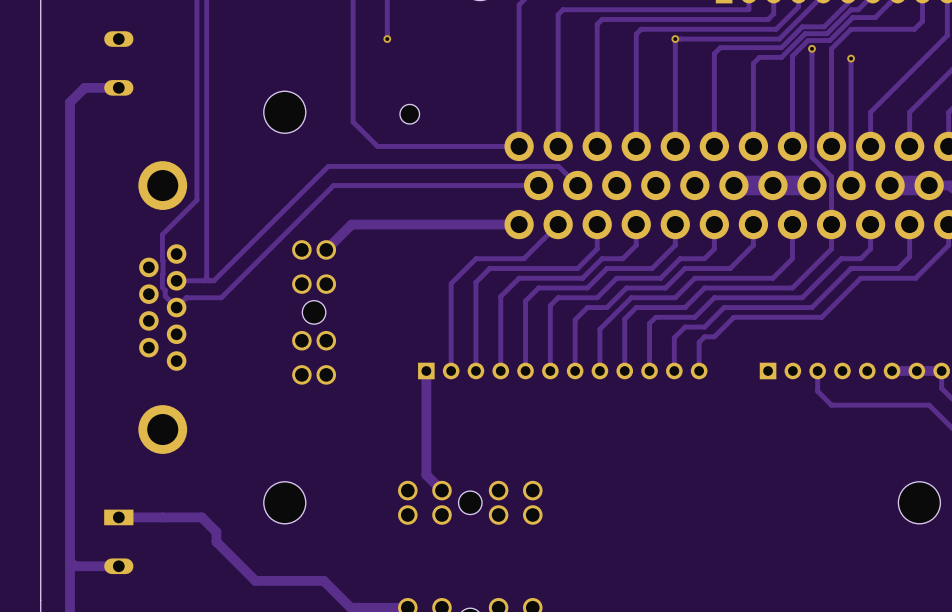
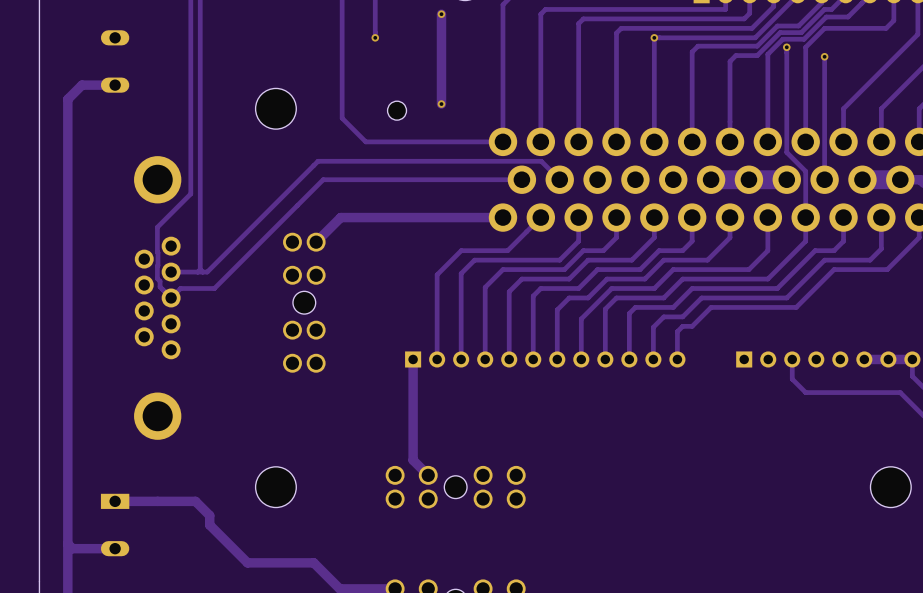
track: none -> (441, 14) (441, 104)
via: none -> (441, 14)
via: none -> (441, 104)

